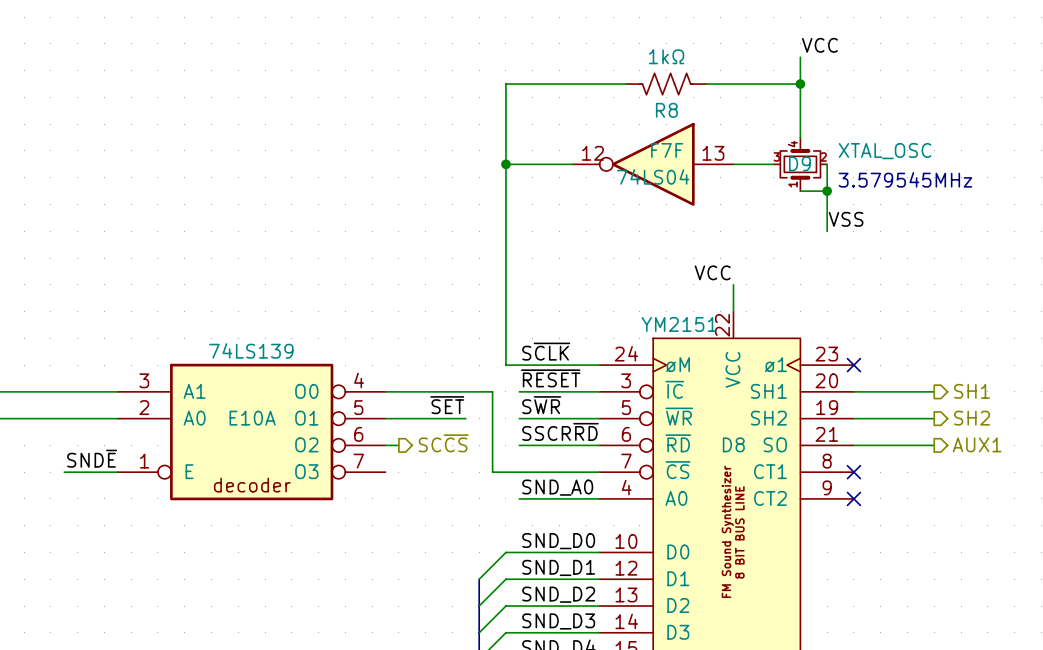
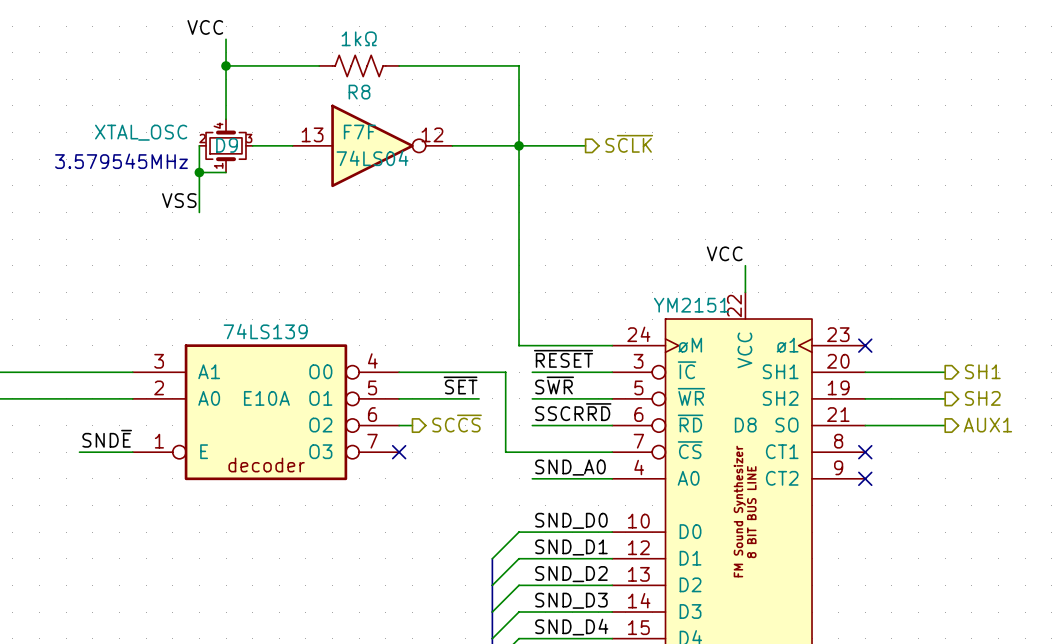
label: none -> VCC (205, 27)
label: VCC (819, 45) -> none
wire: none -> (226, 39) (226, 119)
wire: (800, 57) (800, 137) -> none
wire: none -> (226, 65) (319, 65)
junction: none -> (226, 65)
wire: (505, 84) (626, 84) -> (519, 65) (399, 65)
R8 flip: as is (666, 84) -> left-right (359, 65)
R8 position: (666, 84) -> (359, 65)
wire: (706, 84) (800, 84) -> none
junction: (800, 84) -> none
F7F name position: F7F (667, 150) -> F7F (359, 132)
hierarchical label: none -> S~{CLK} (629, 143)
wire: none -> (199, 145) (199, 212)
wire: none -> (252, 145) (292, 145)
wire: none -> (452, 145) (519, 145)
F7F rotation: 0° (653, 164) -> 180° (372, 145)
F7F position: (653, 164) -> (372, 145)
wire: (733, 164) (773, 164) -> none
D9 flip: as is (800, 164) -> left-right (226, 145)
D9 position: (800, 164) -> (226, 145)
wire: (827, 164) (827, 231) -> none
text: none -> 3.579545MHz (121, 161)
text: 3.579545MHz (905, 179) -> none
wire: none -> (199, 172) (226, 172)
junction: none -> (199, 172)
wire: (800, 191) (827, 191) -> none
junction: (827, 191) -> none
label: none -> VSS (179, 200)
label: VSS (846, 219) -> none
label: S~{CLK} (546, 351) -> none
no-connect mark: none -> (399, 452)

